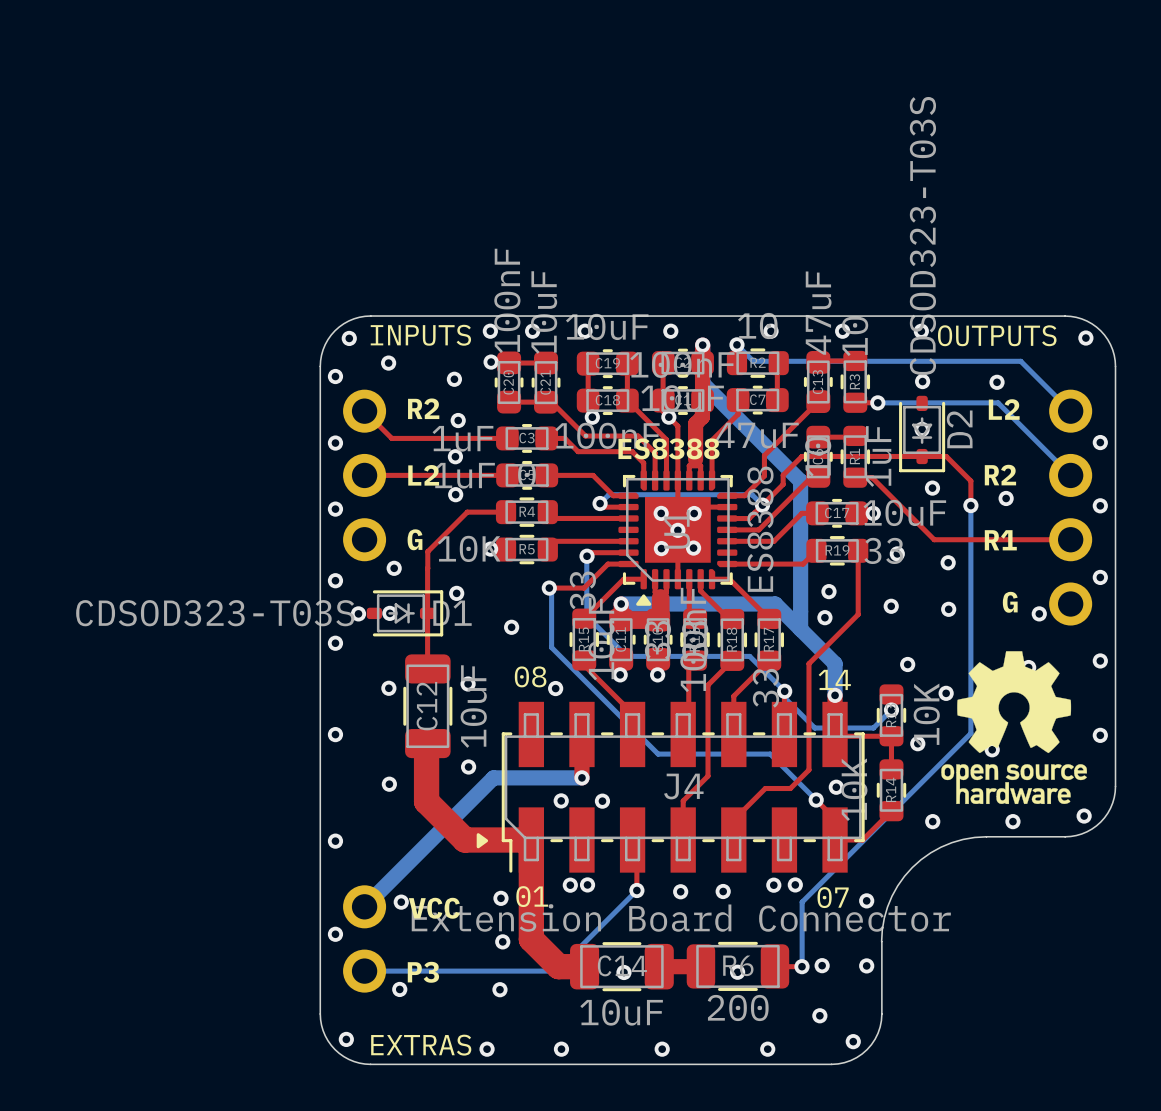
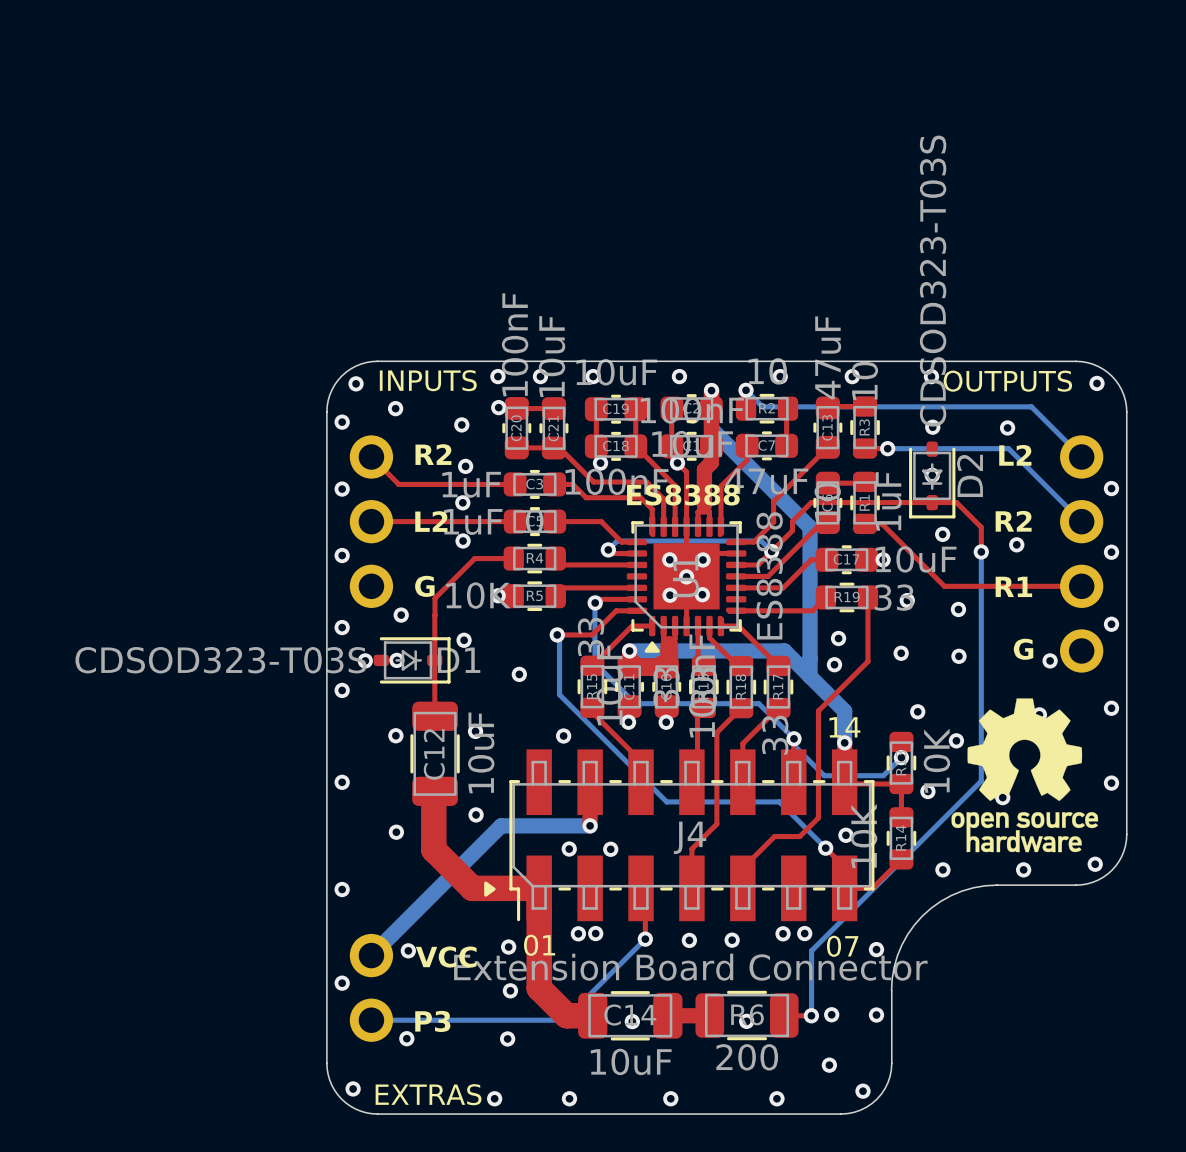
text: 08 (530, 676) -> none

